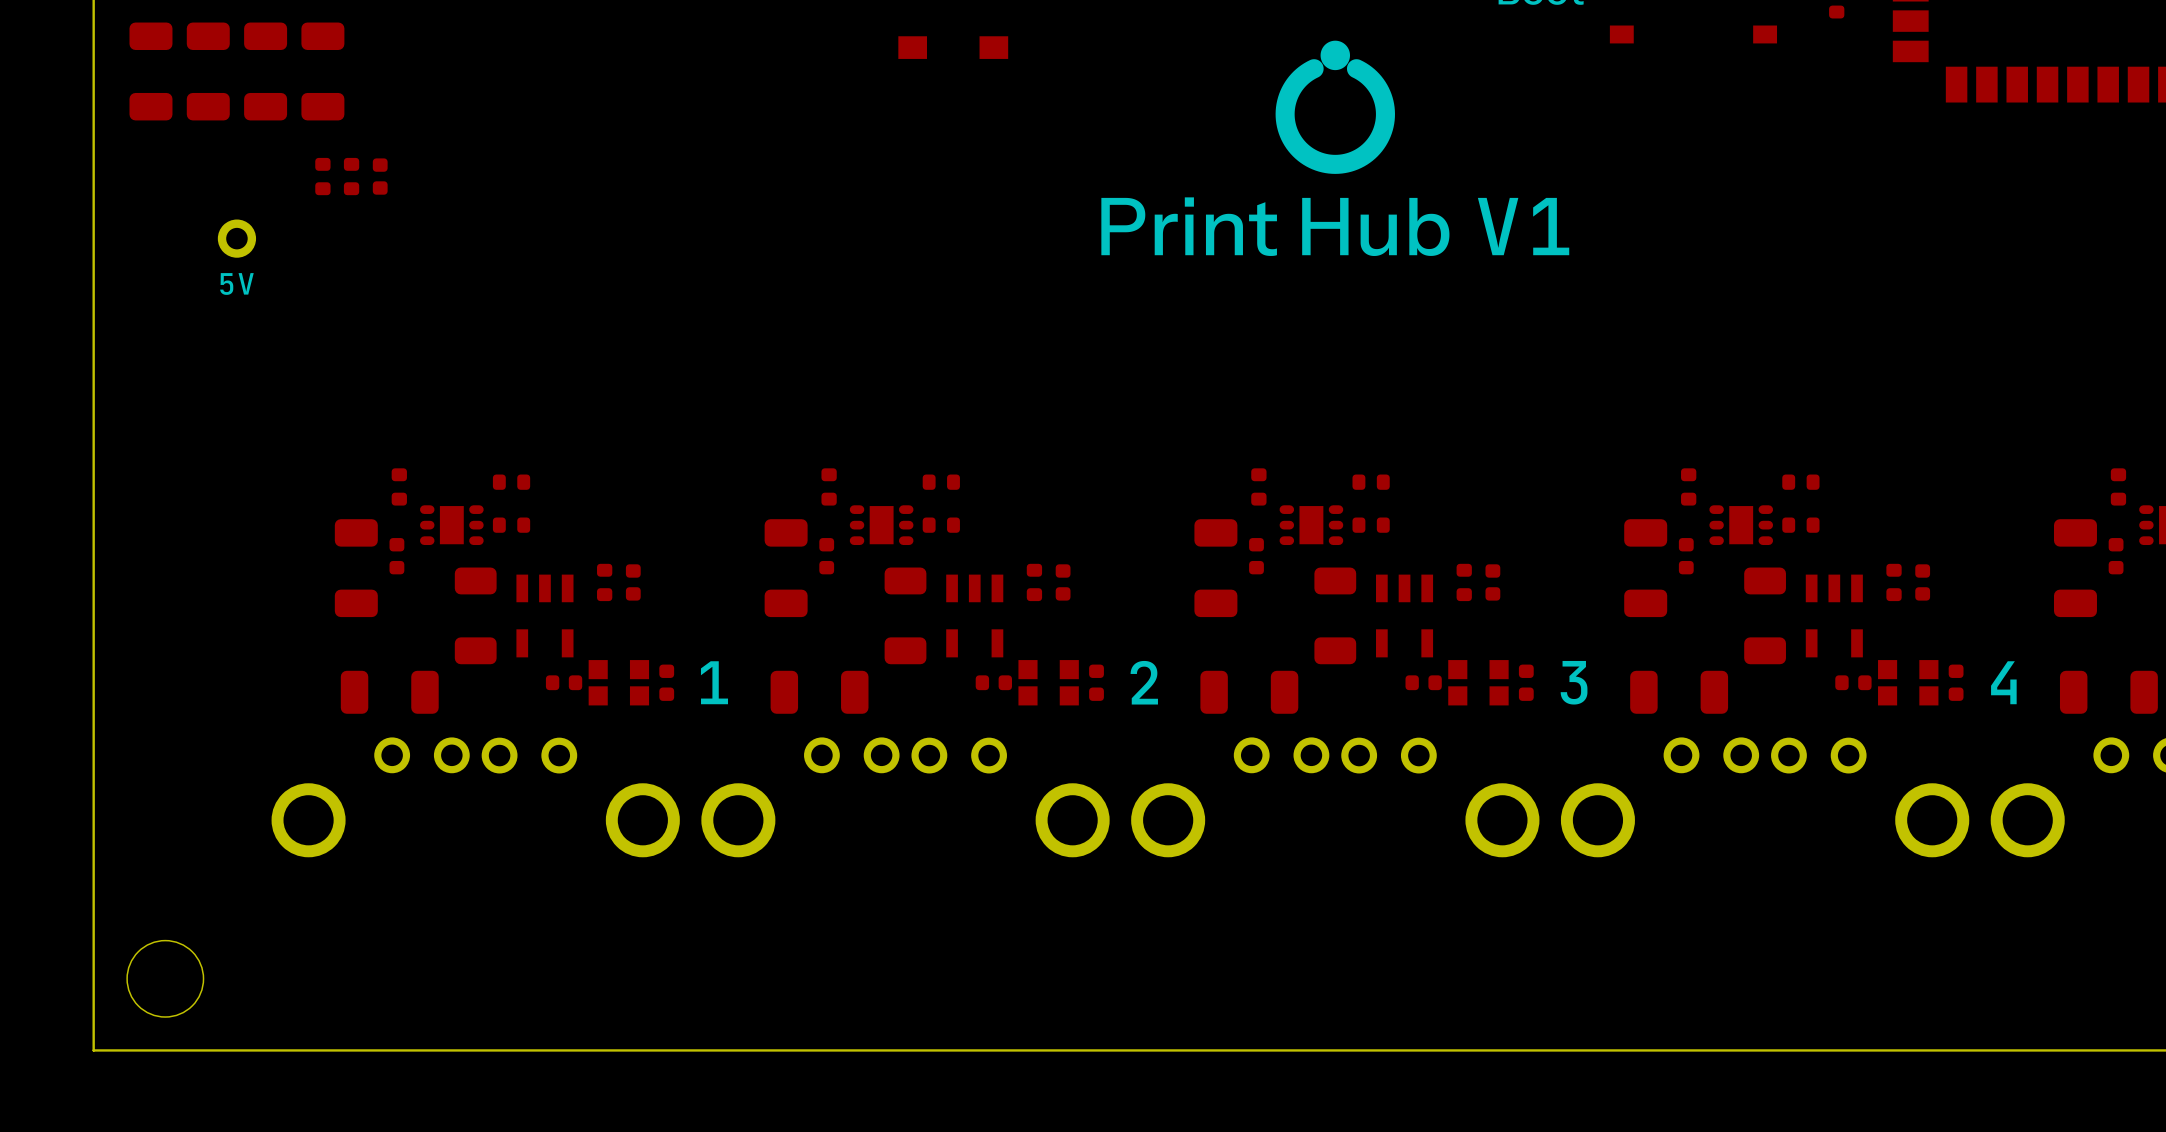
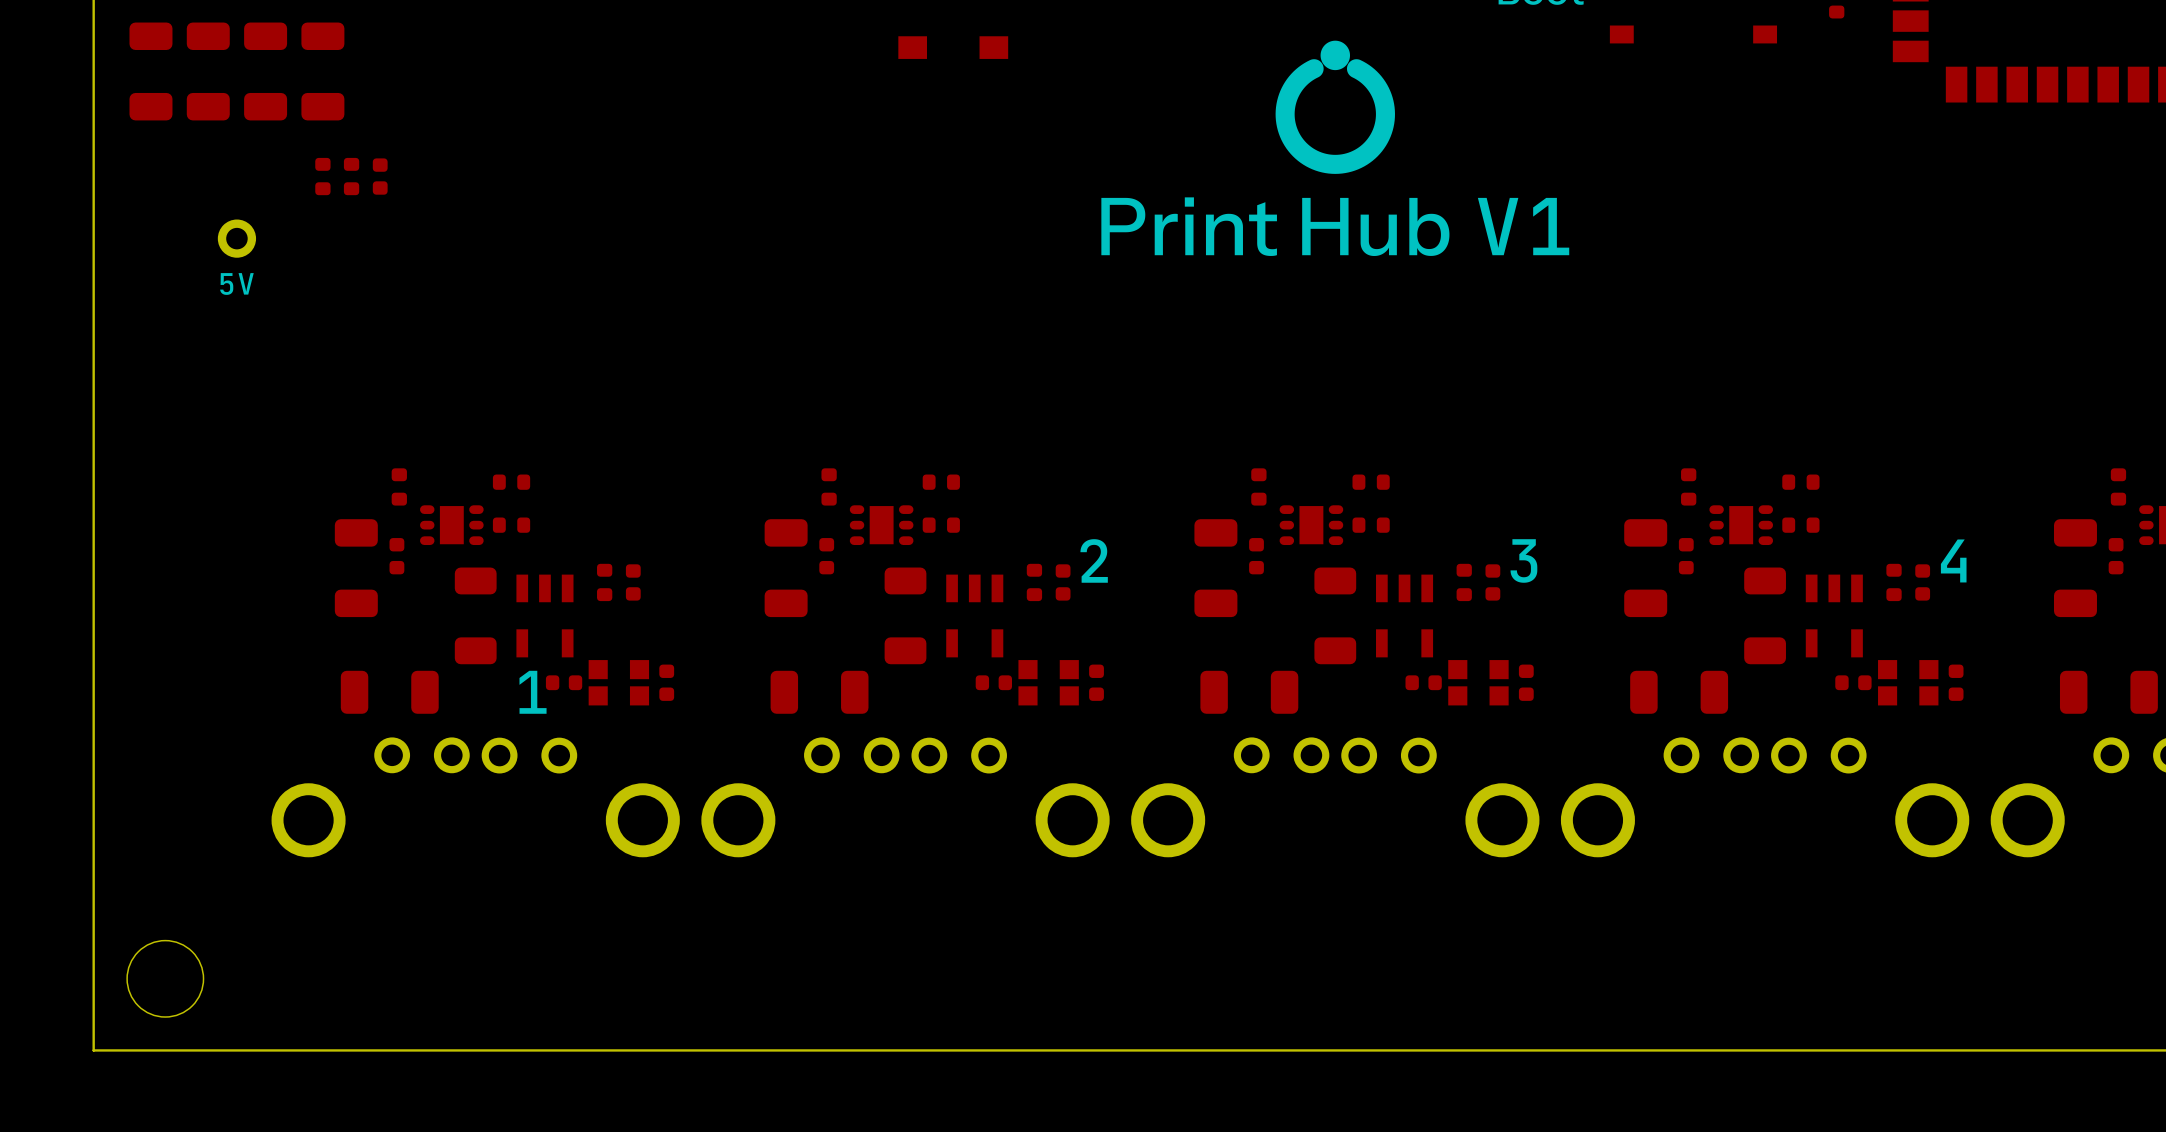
drawing position: (714, 682) -> (533, 692)
drawing position: (1144, 682) -> (1094, 560)
drawing position: (1574, 682) -> (1523, 560)
drawing position: (2003, 682) -> (1953, 560)

